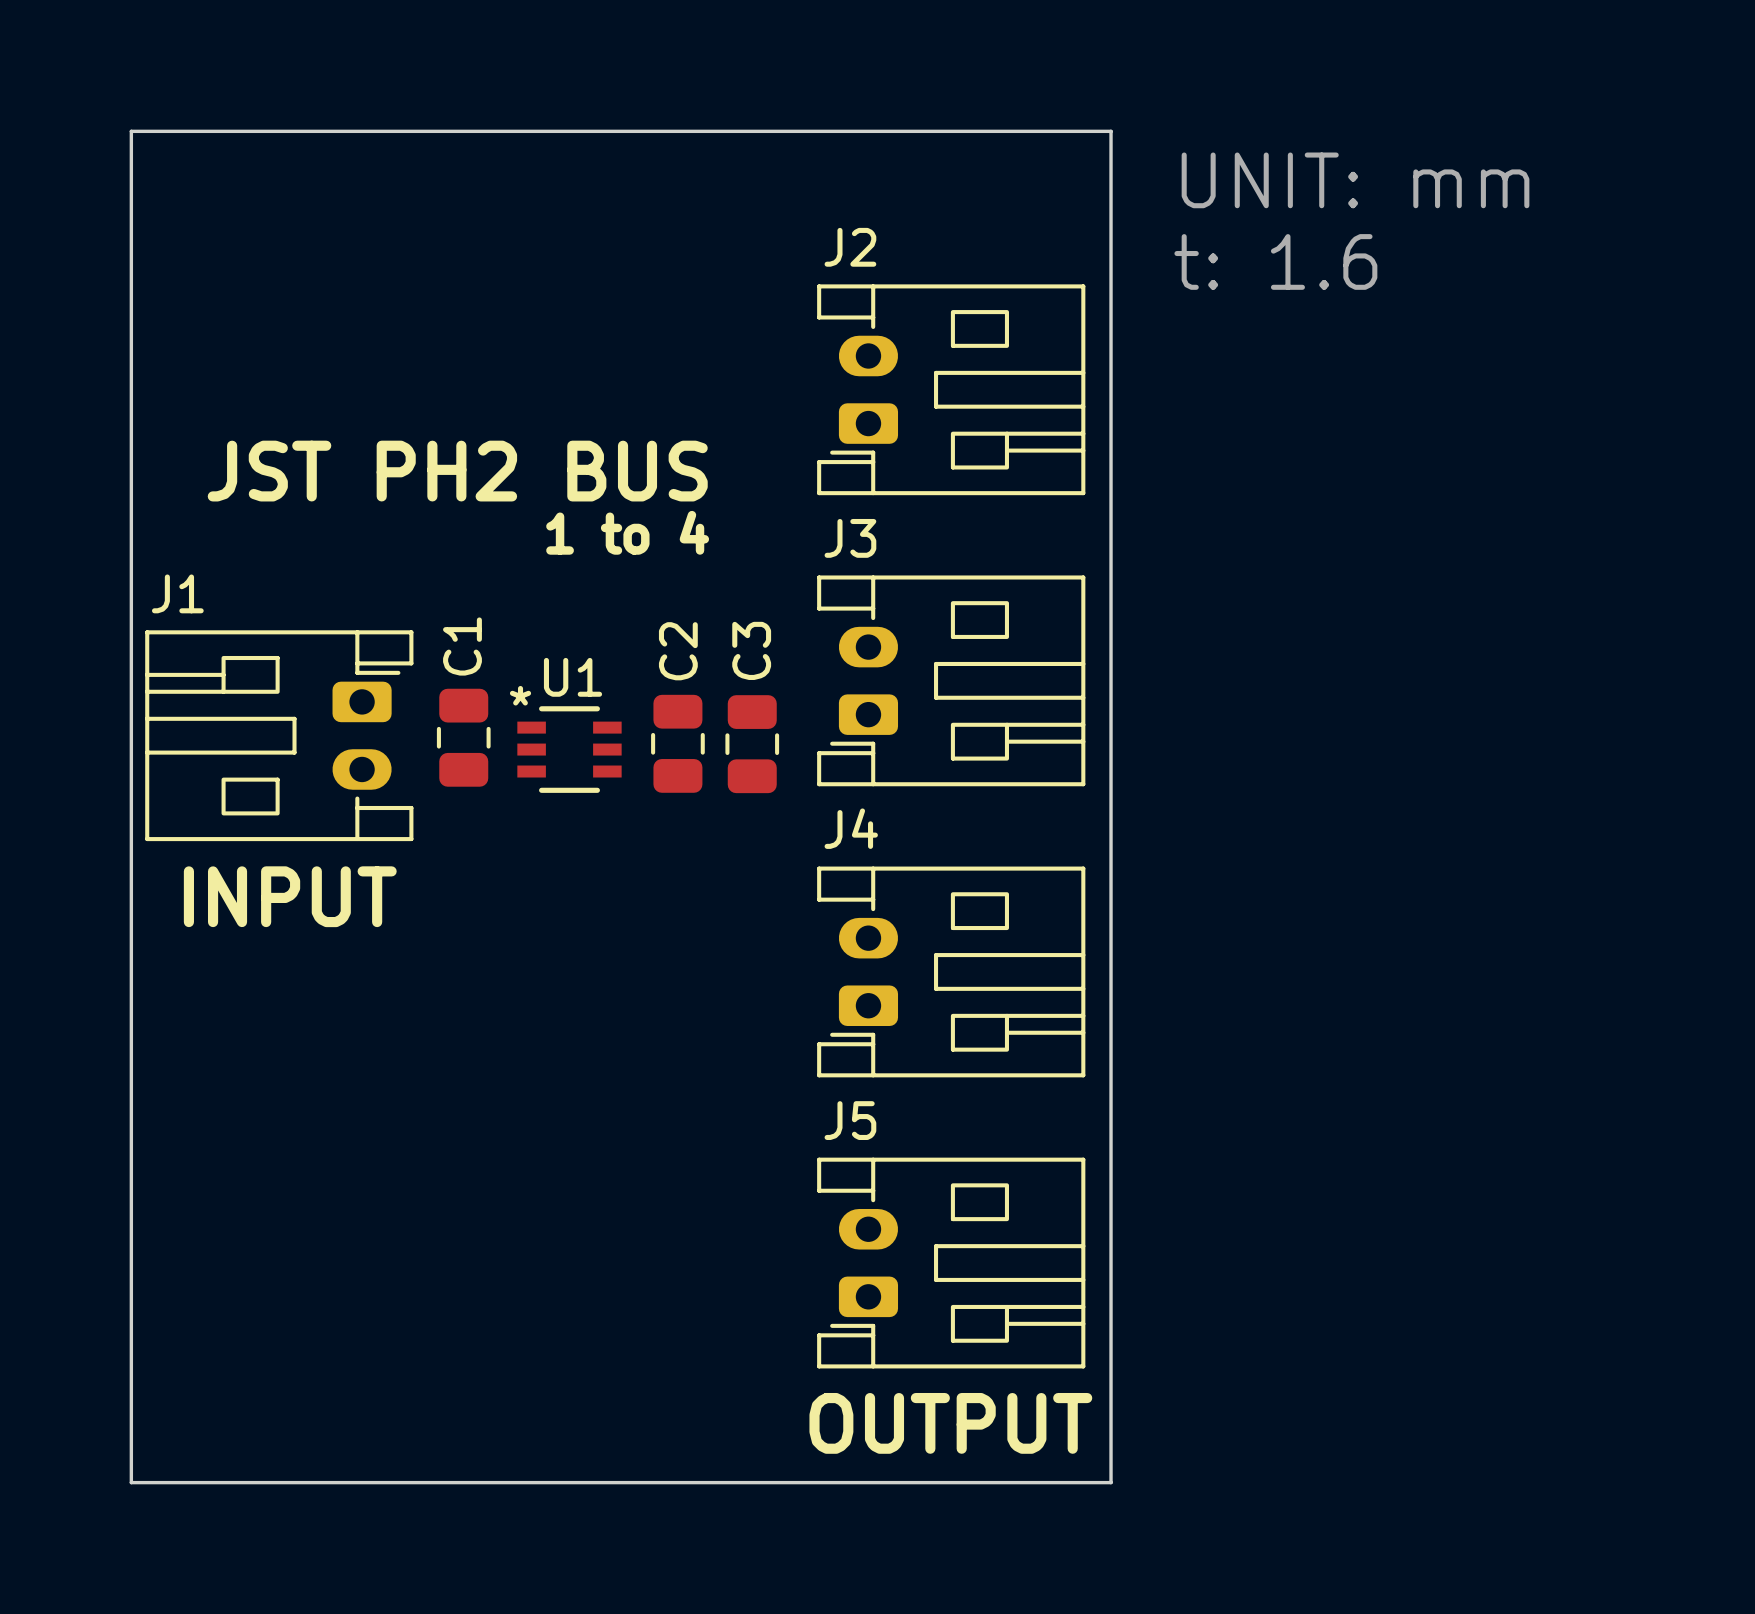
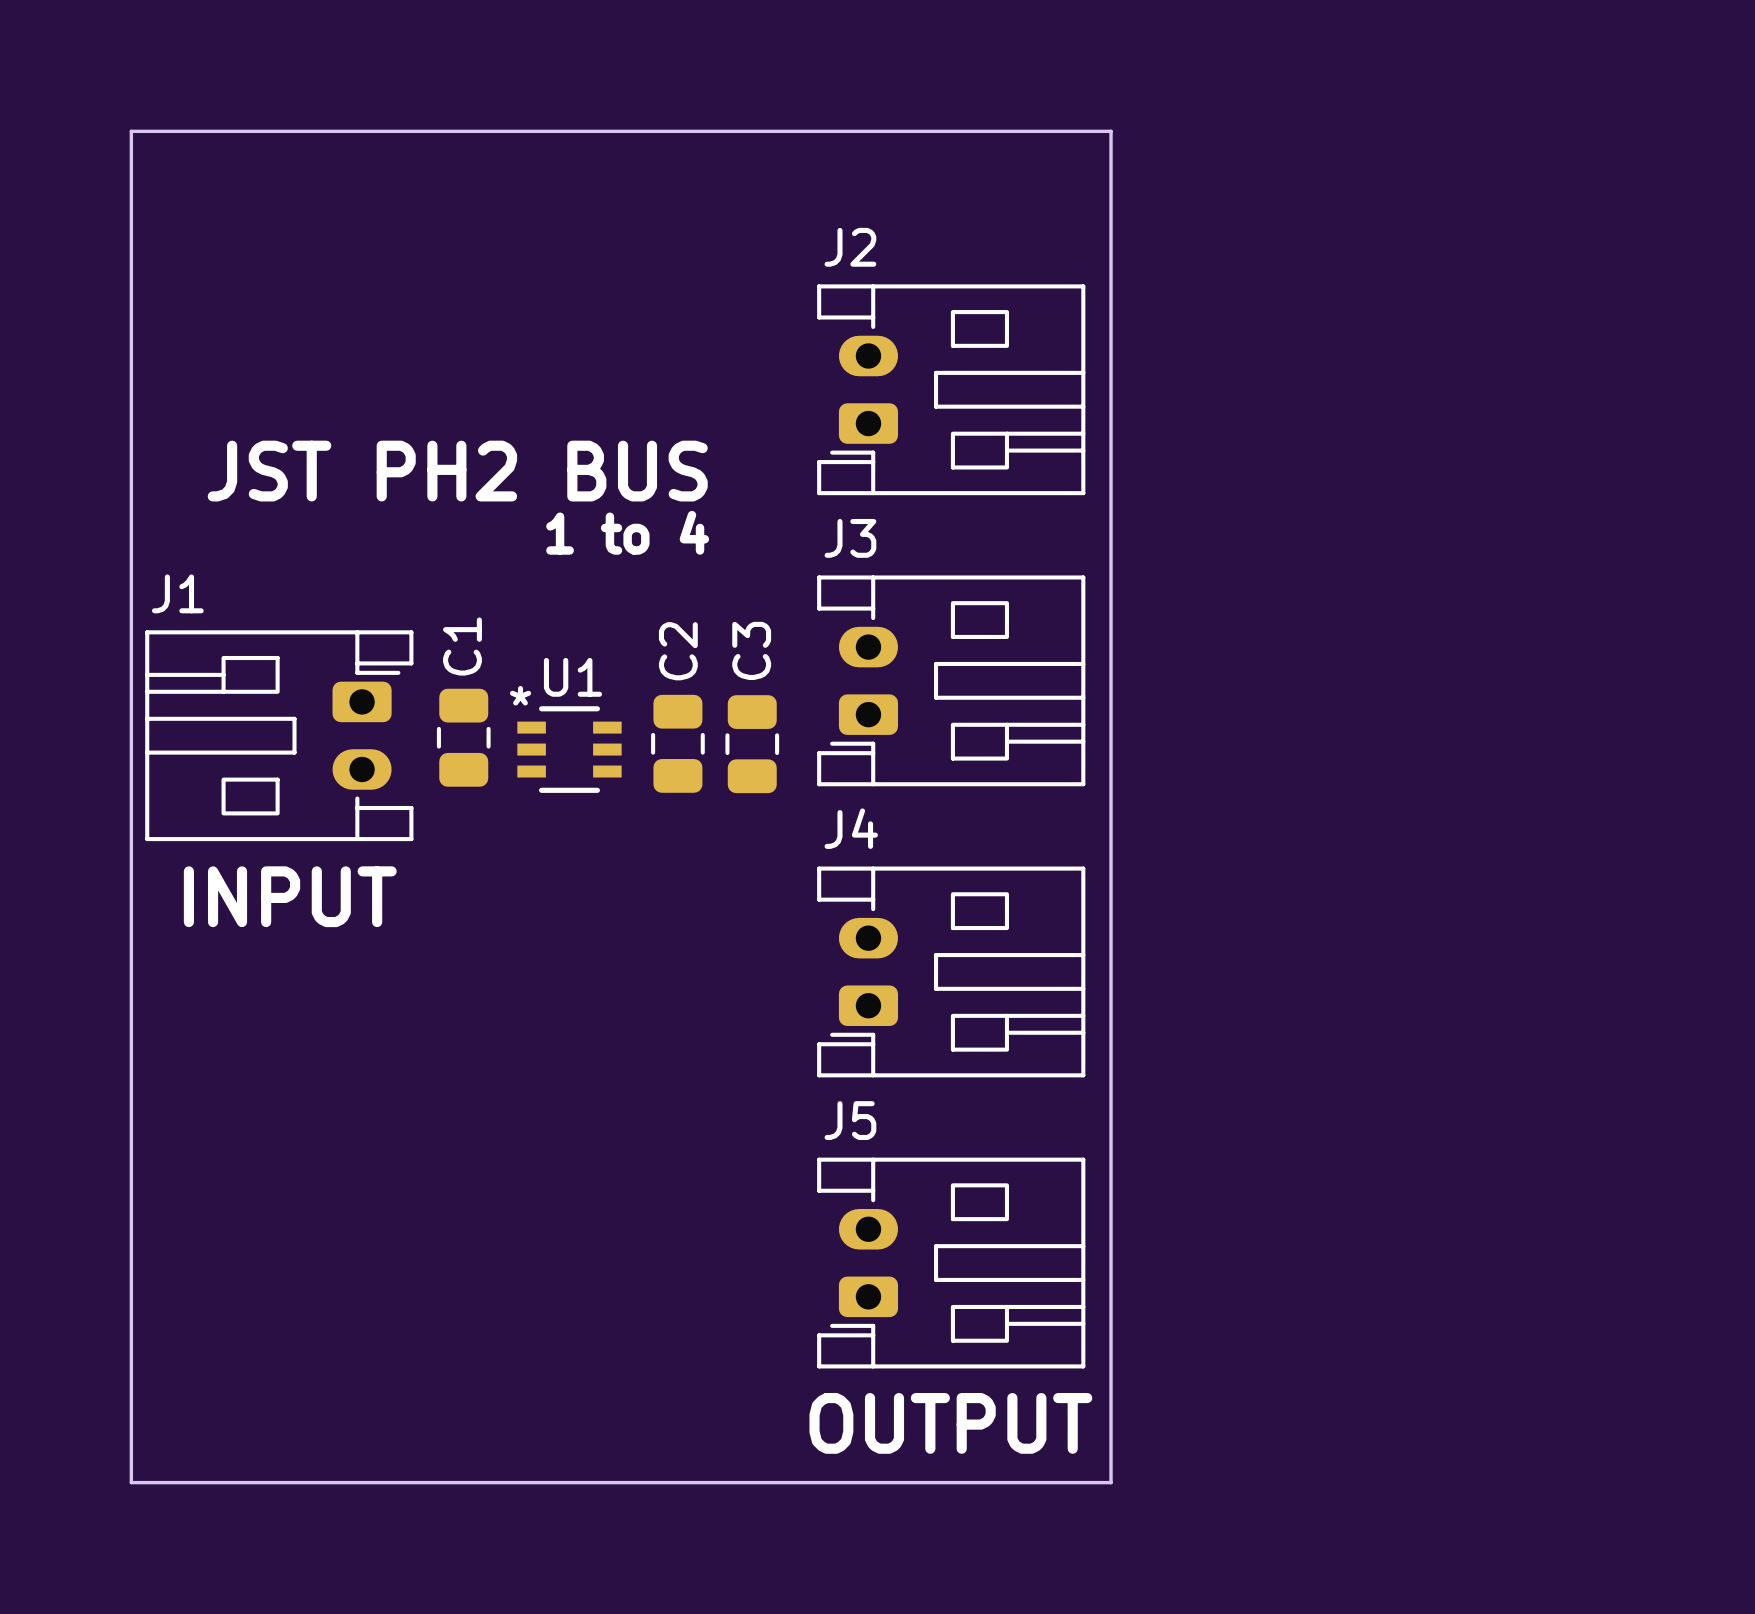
text: UNIT: mm (1355, 180) -> none
text: t: 1.6 (1275, 261) -> none

